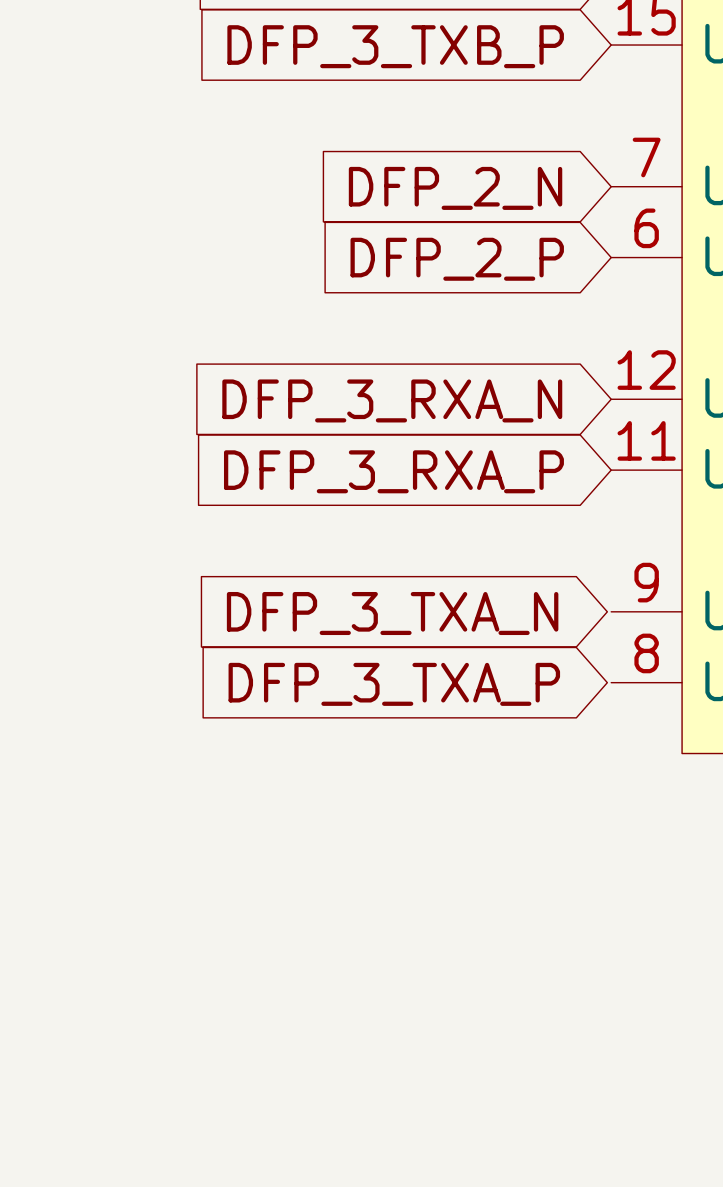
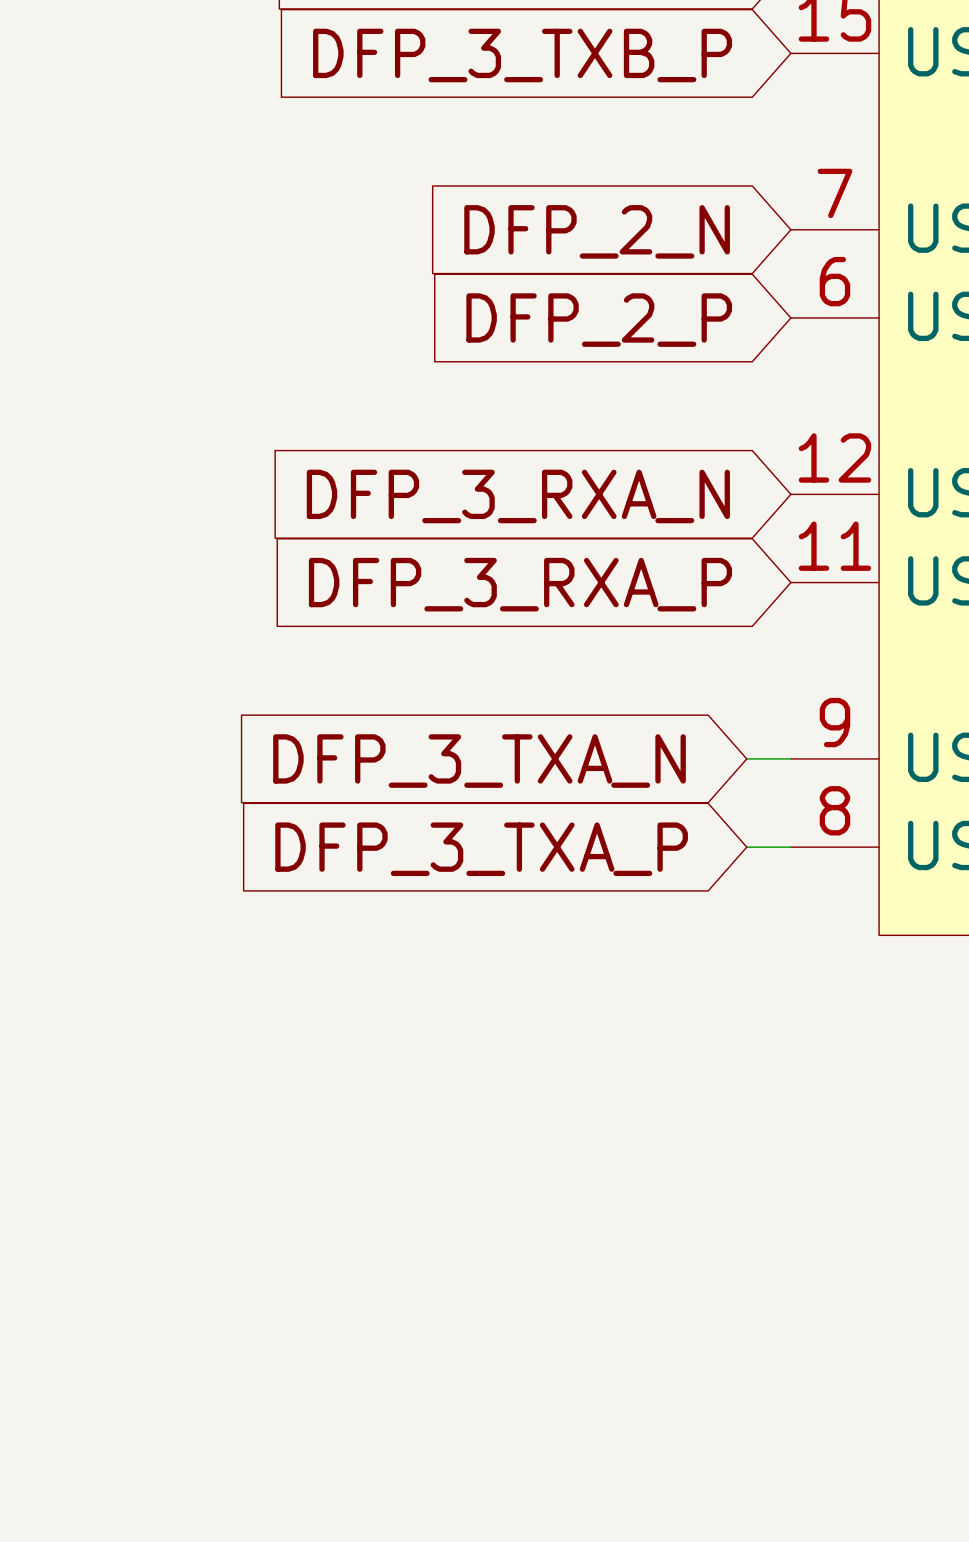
wire: none -> (746, 758) (790, 758)
global label position: DFP_3_TXA_N (392, 613) -> DFP_3_TXA_N (479, 761)
wire: none -> (746, 847) (790, 847)
global label position: DFP_3_TXA_P (394, 684) -> DFP_3_TXA_P (481, 849)

